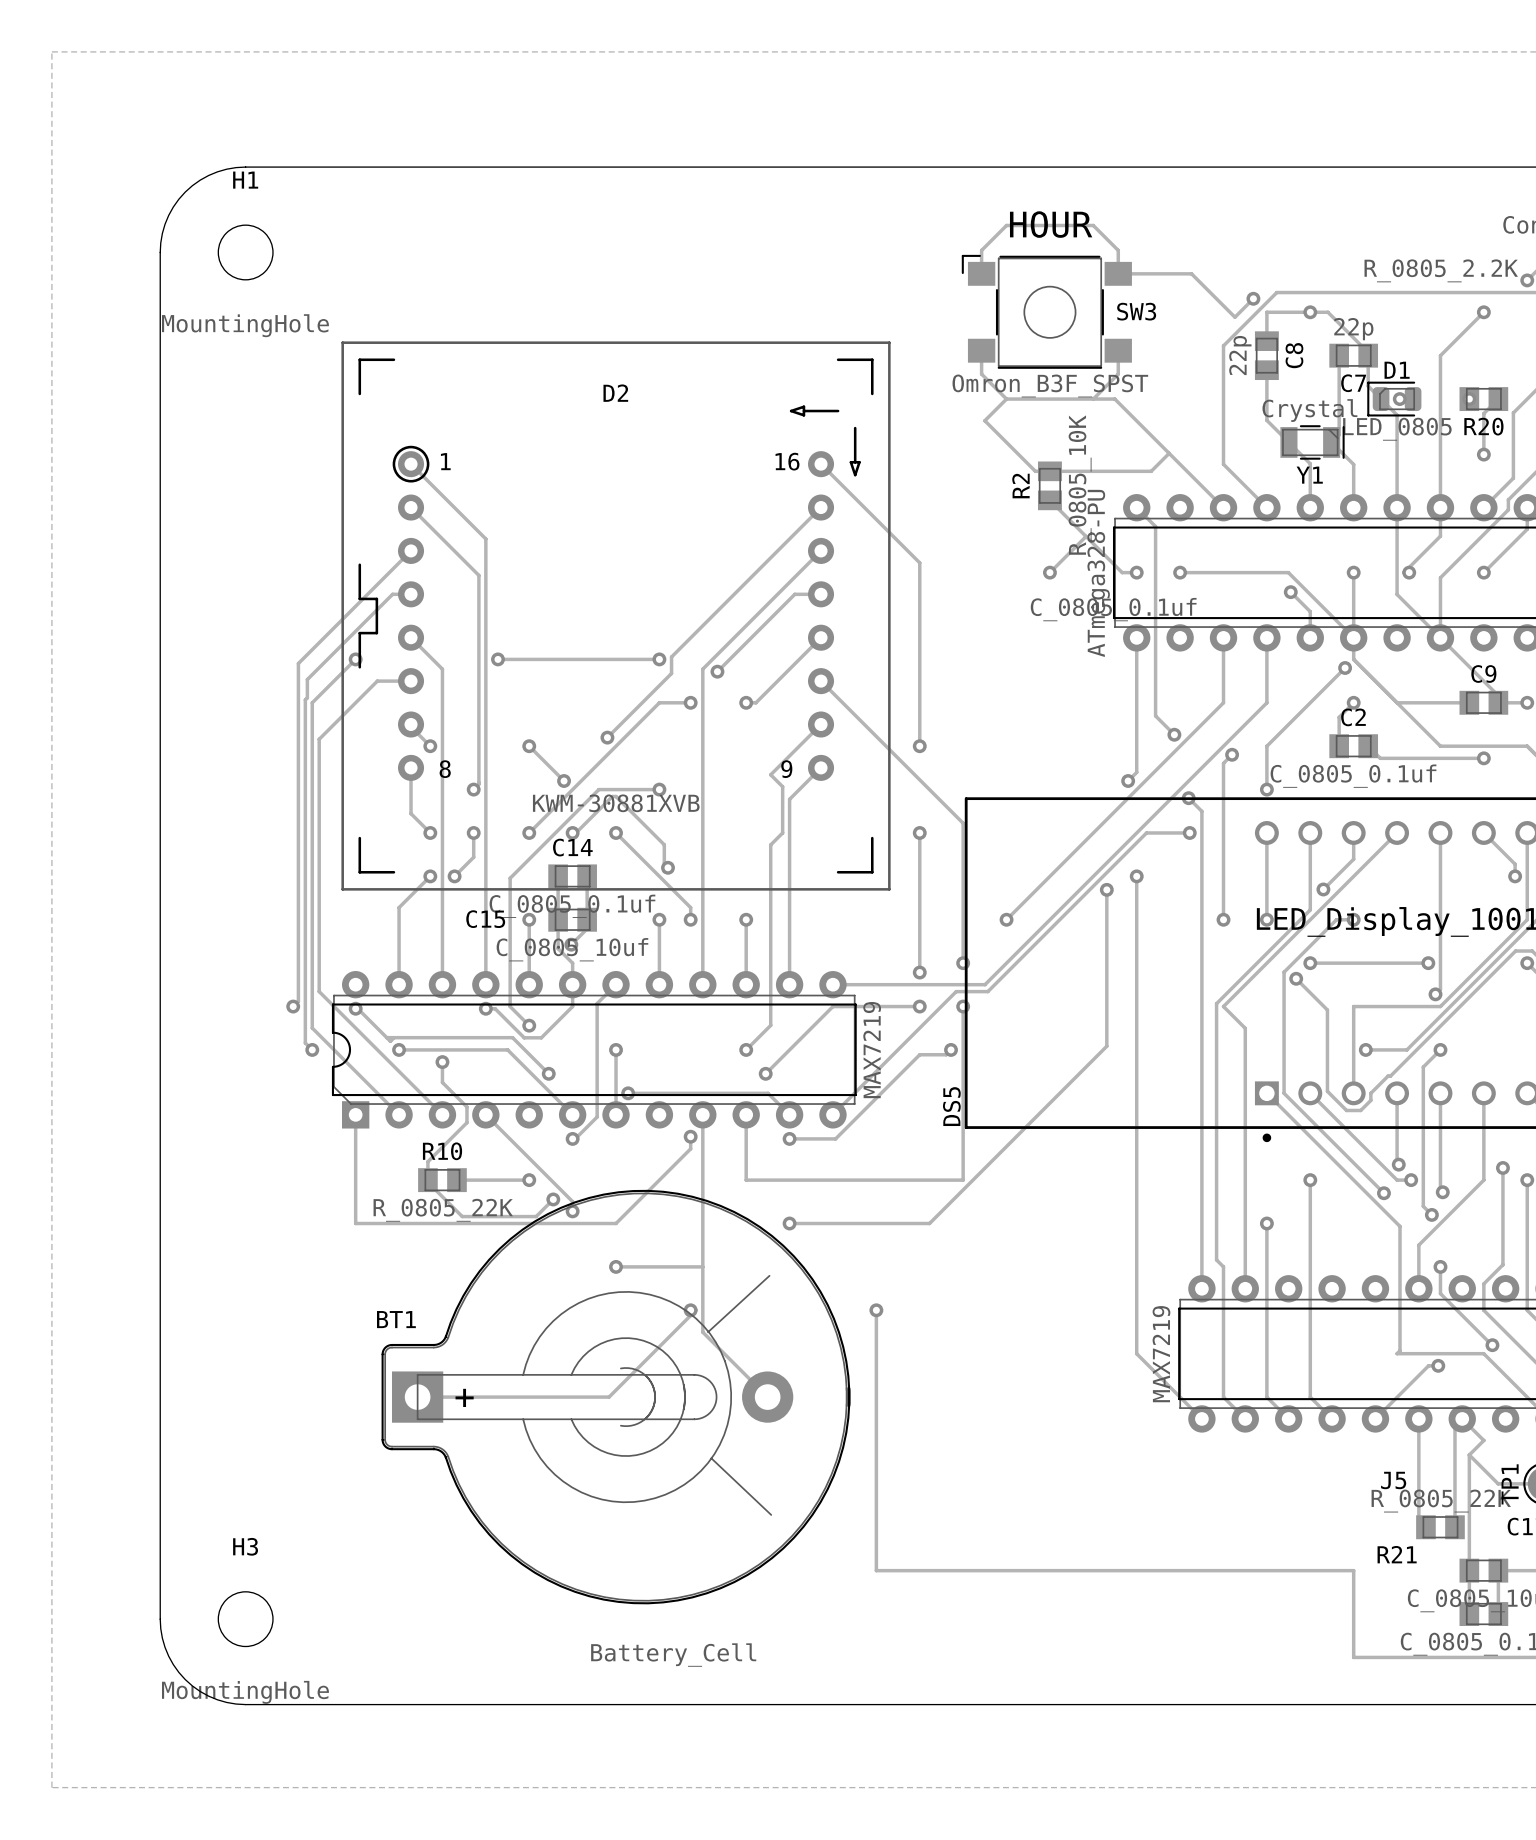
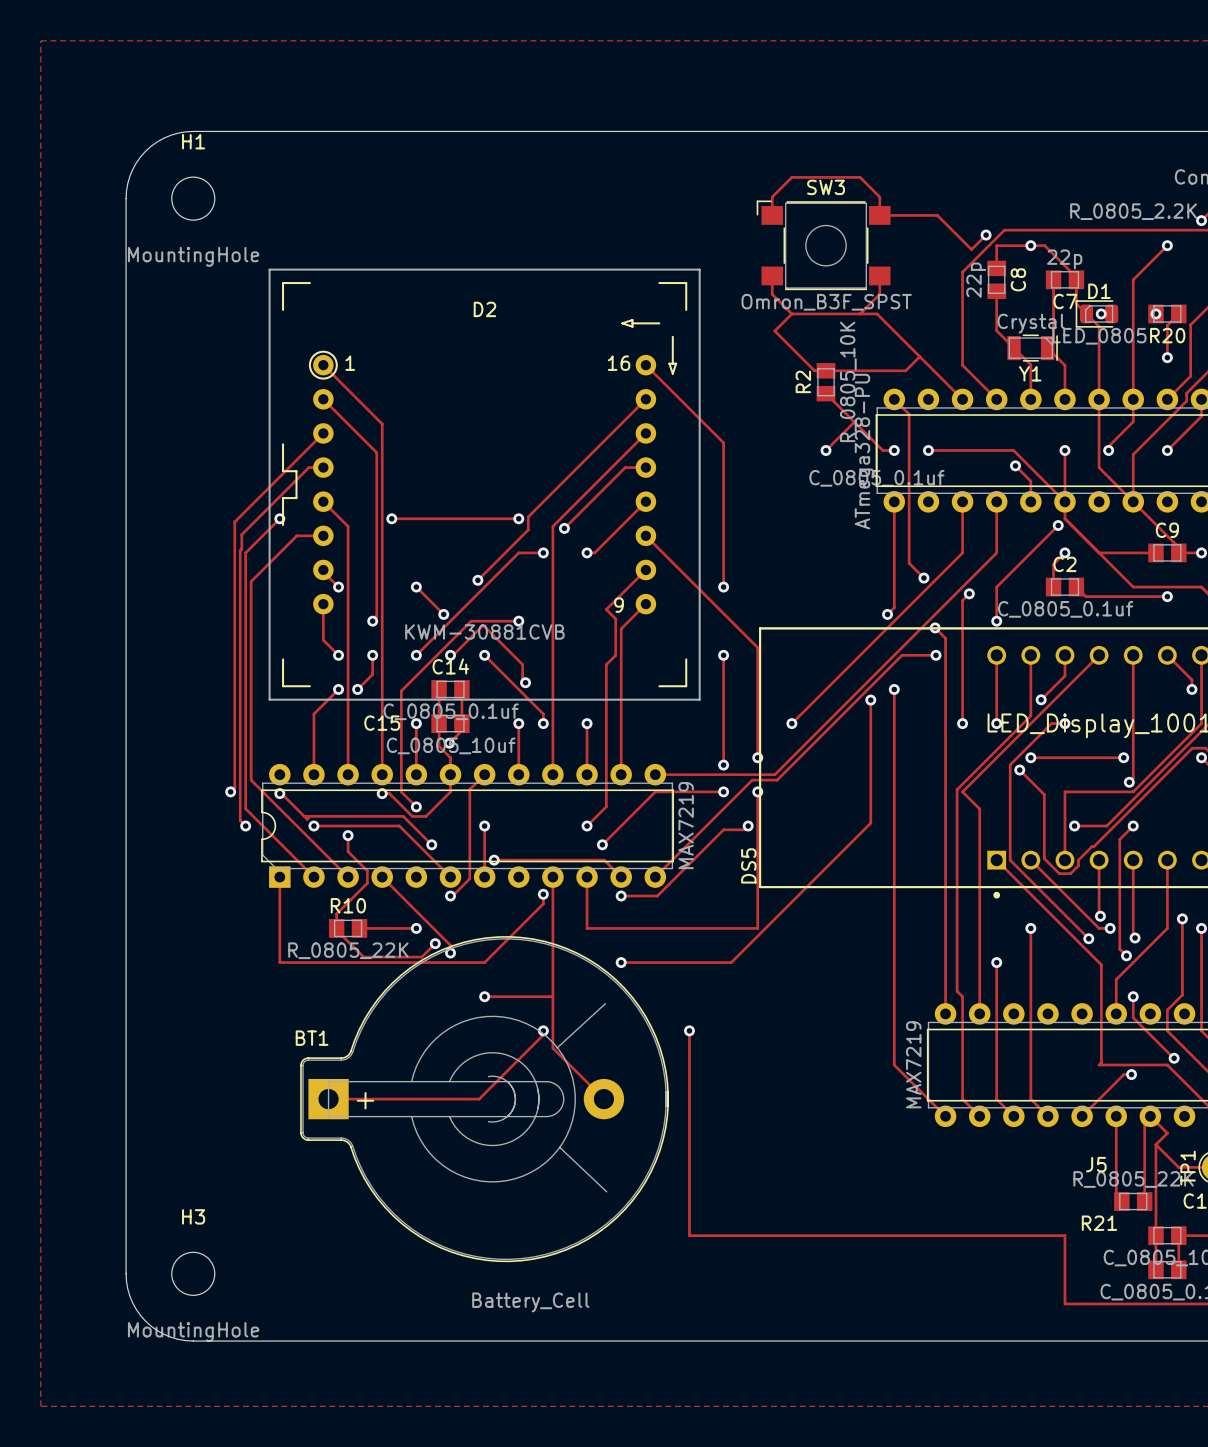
text: HOUR (1051, 224) -> none
SW3 name position: SW3 (1136, 311) -> SW3 (826, 187)
D2 text: 8 (445, 769) -> none
D2 value: KWM-30881XVB (616, 803) -> KWM-30881CVB (484, 631)

